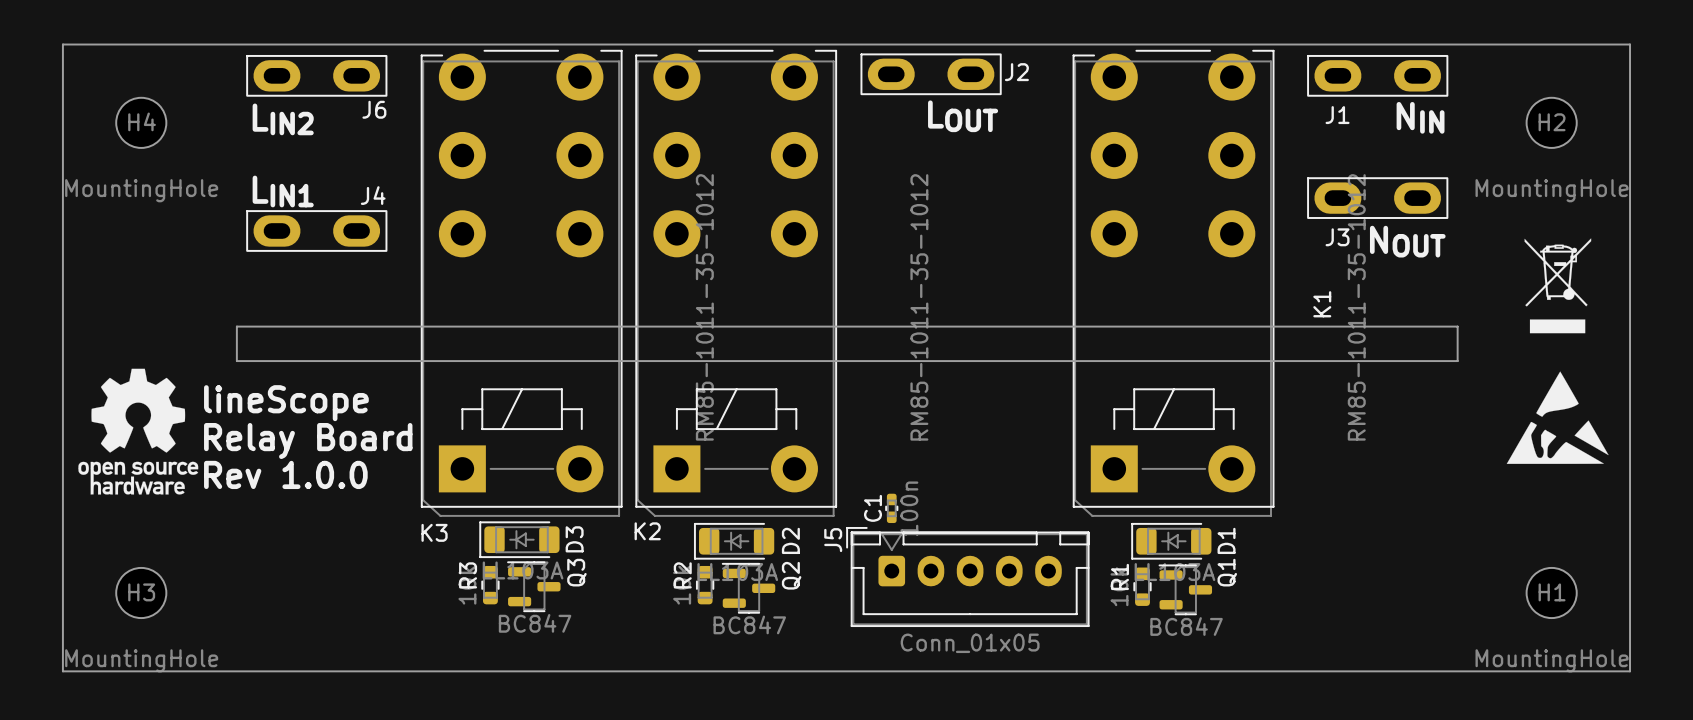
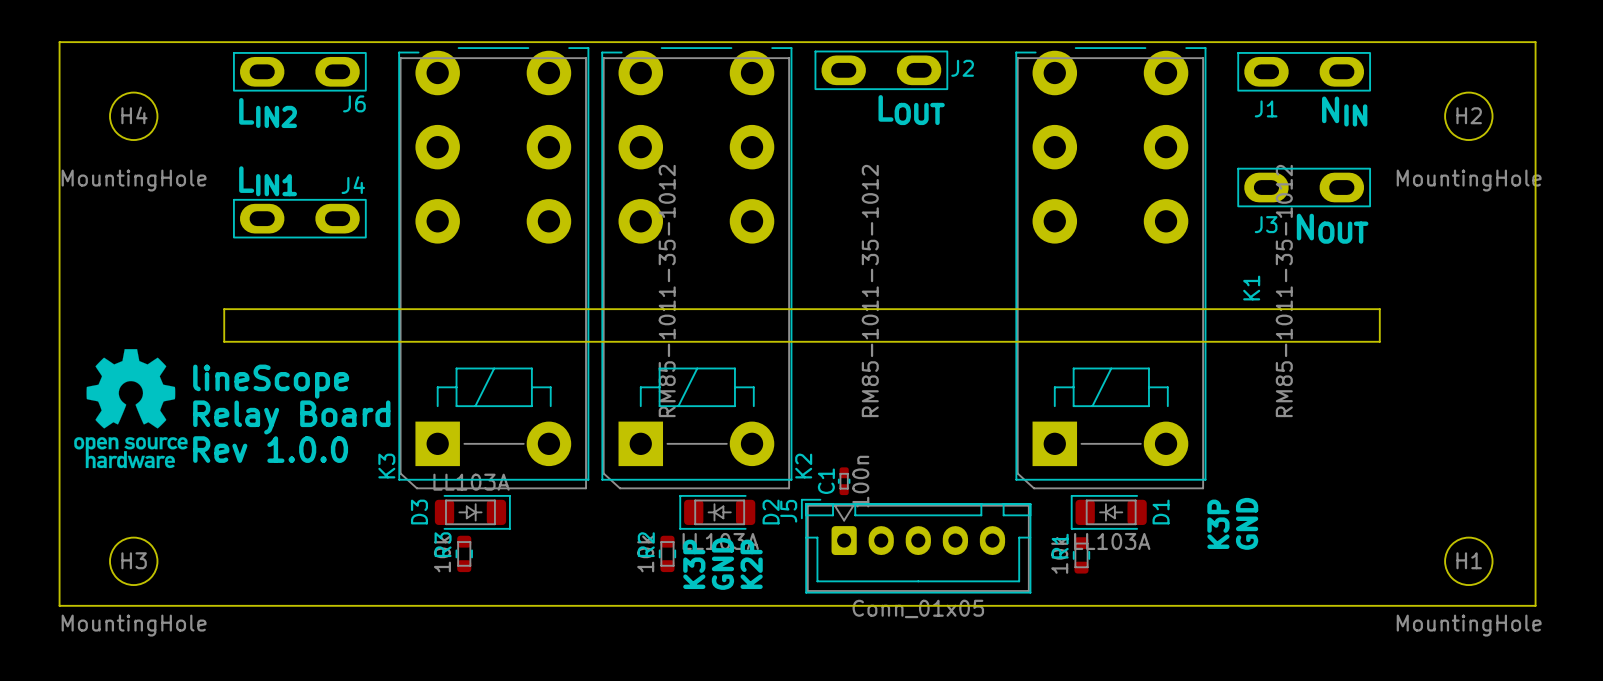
board edge: (1622, 44) (1630, 44) (1630, 671) (62, 671) (62, 640) -> (1535, 42) (1535, 605) (59, 605)
drawing: [1524, 238, 1592, 334] -> none
drawing: [1506, 371, 1609, 464] -> none
K2 name rotation: 0° (647, 531) -> 90° counterclockwise (803, 466)
K2 name position: K2 (647, 531) -> K2 (803, 466)
K3 name rotation: 0° (434, 532) -> 90° counterclockwise (386, 466)
K3 name position: K3 (434, 532) -> K3 (386, 466)
D3 rotation: 0° (519, 539) -> 180° (472, 512)
D2 position: (734, 541) -> (717, 512)
text: none -> K3P (1218, 524)
text: none -> GND (1247, 523)
Q3: BC847 (533, 586) -> none
Q2: BC847 (748, 588) -> none
Q1: BC847 (1185, 589) -> none
text: none -> GND (722, 563)
text: none -> K3P (694, 564)
text: none -> K2P (751, 564)

